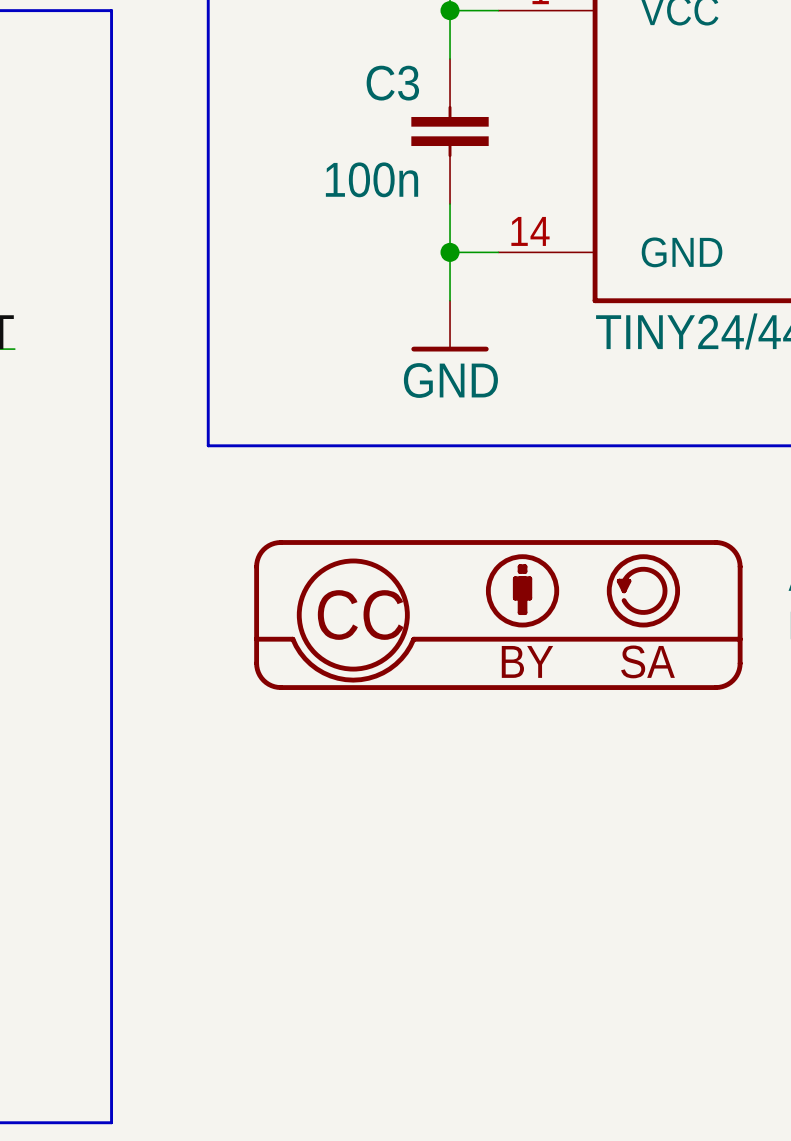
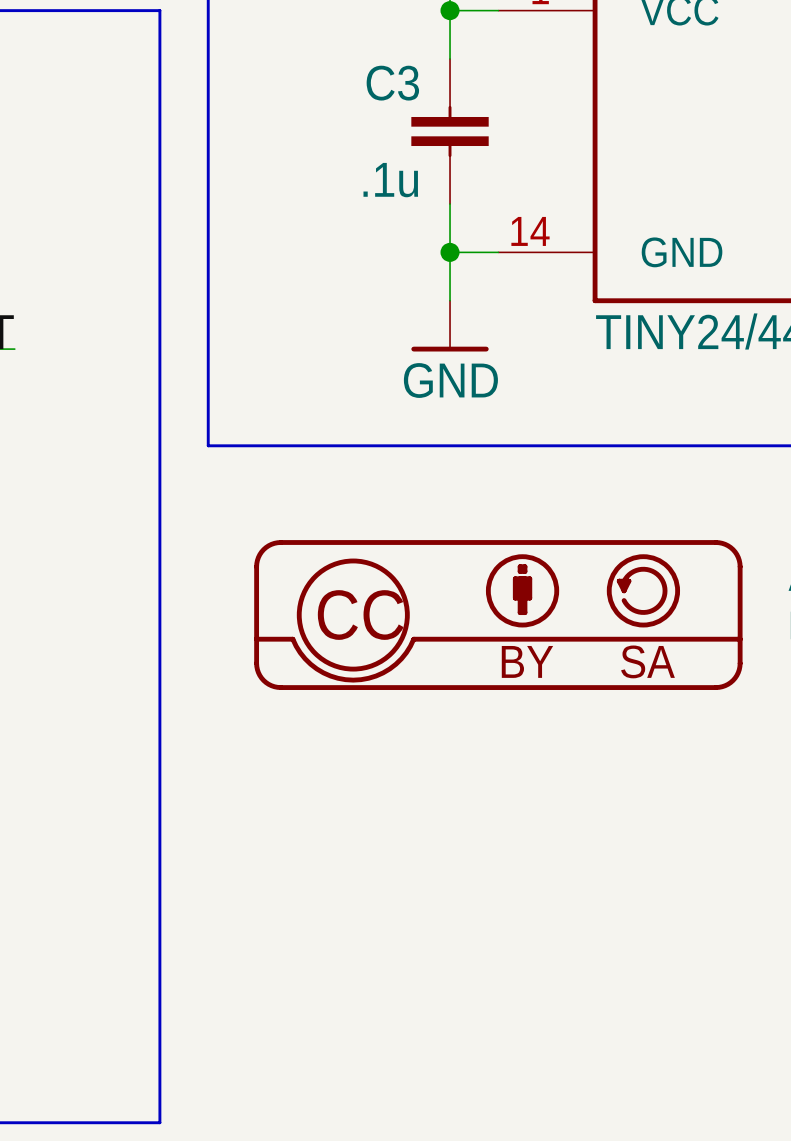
line: (111, 10) (111, 1122) -> (111, 10) (159, 10) (159, 1122) (111, 1122)
C3 value: 100n (372, 179) -> .1u (390, 180)

